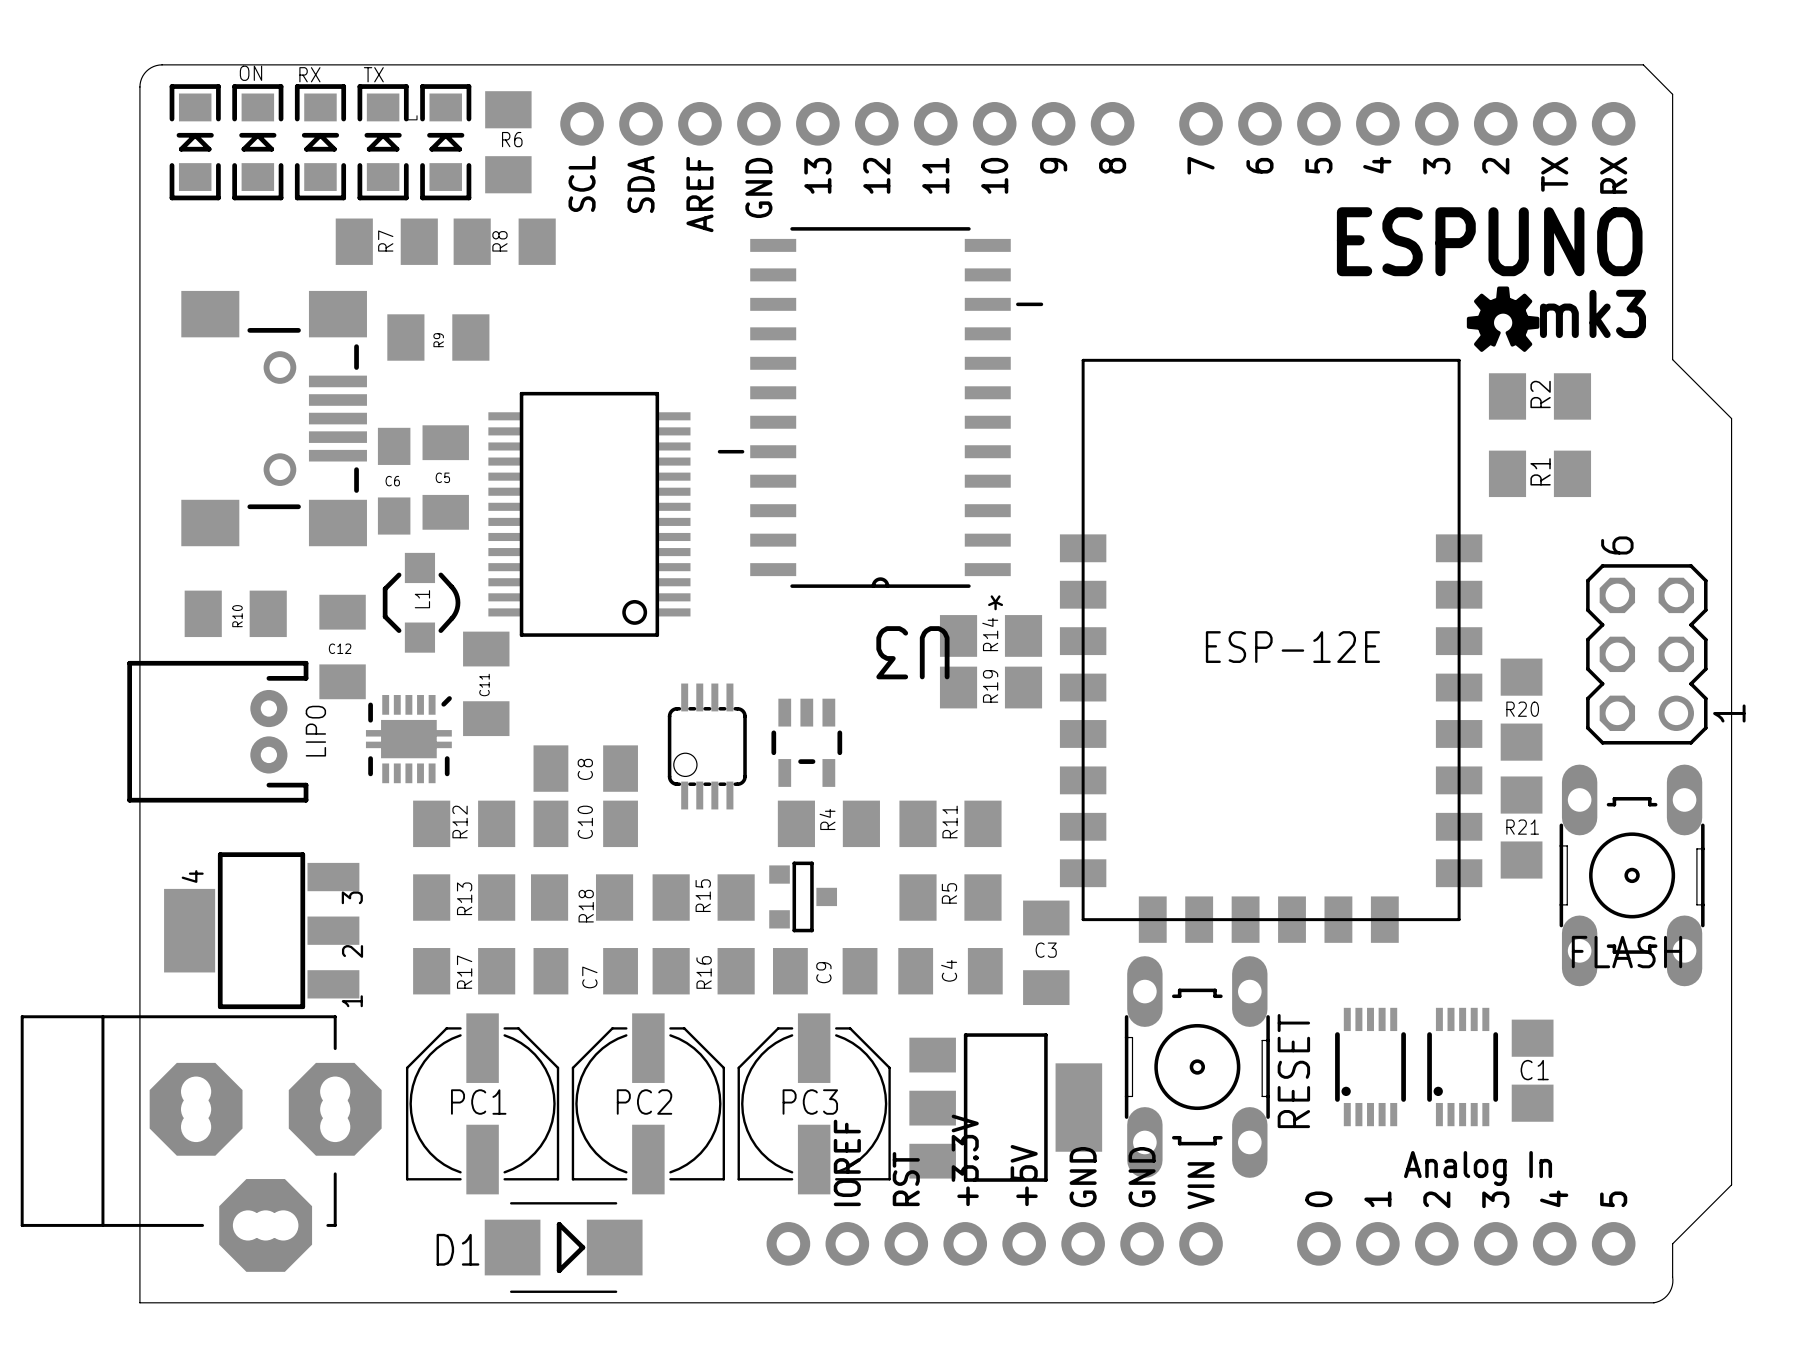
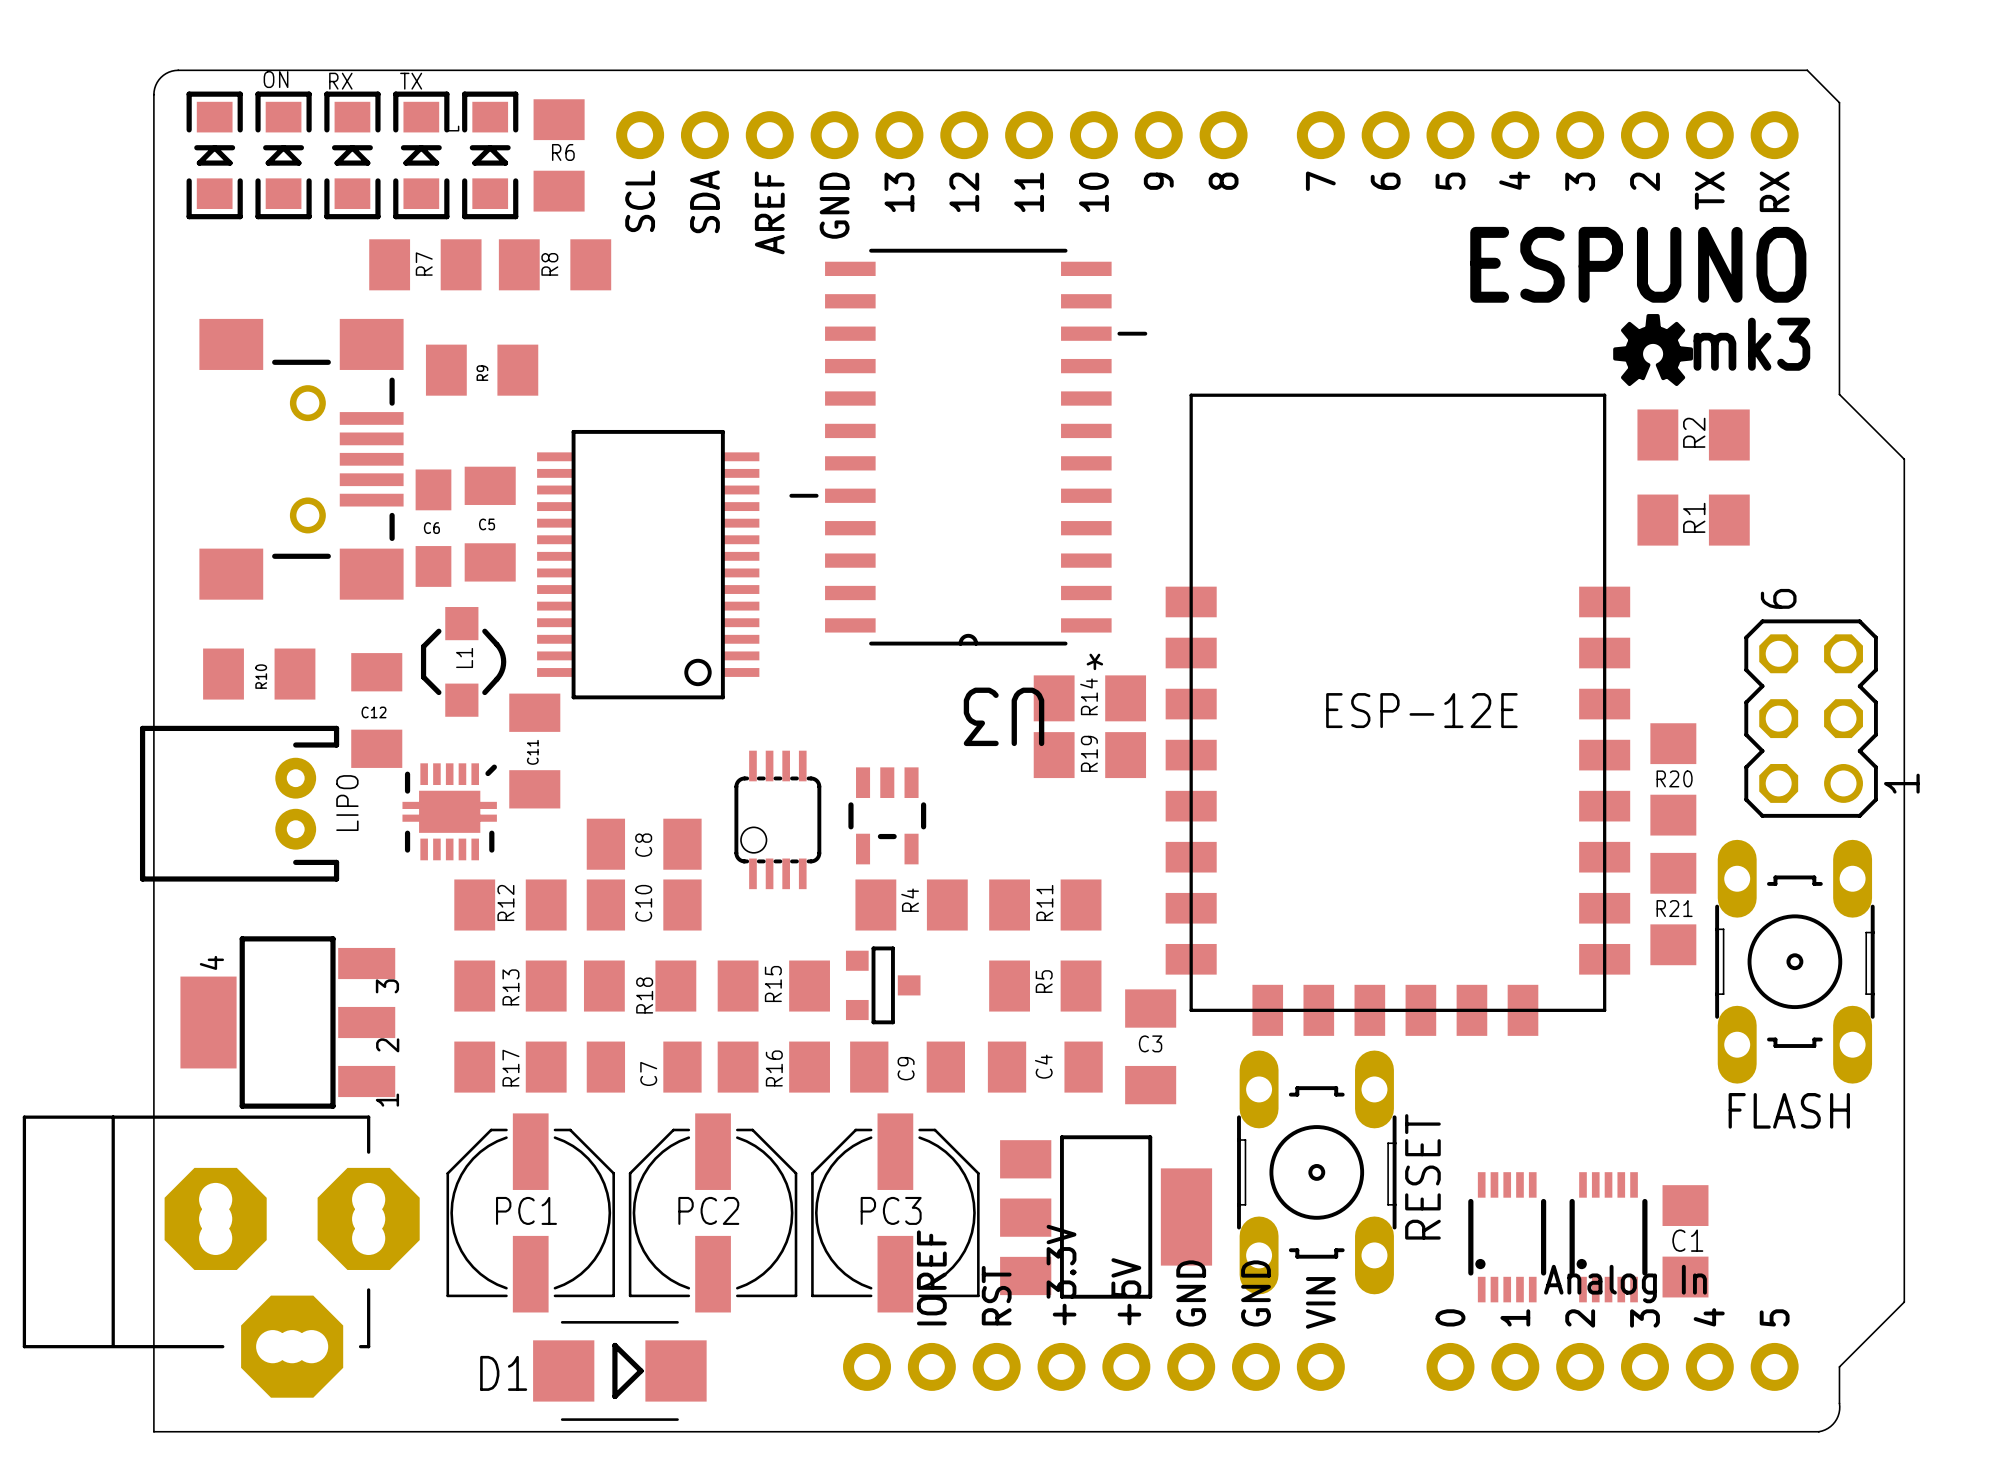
FLASH name position: FLASH (1626, 952) -> FLASH (1789, 1110)
part: (1370, 1067) -> none
part: (1462, 1067) -> none
C1 position: (1532, 1070) -> (1685, 1241)
part: none -> (1507, 1237)
part: none -> (1608, 1237)

